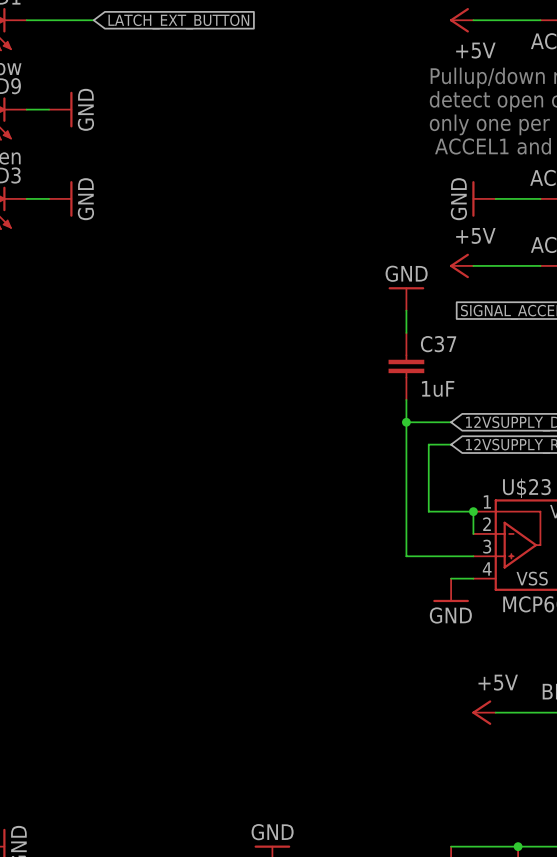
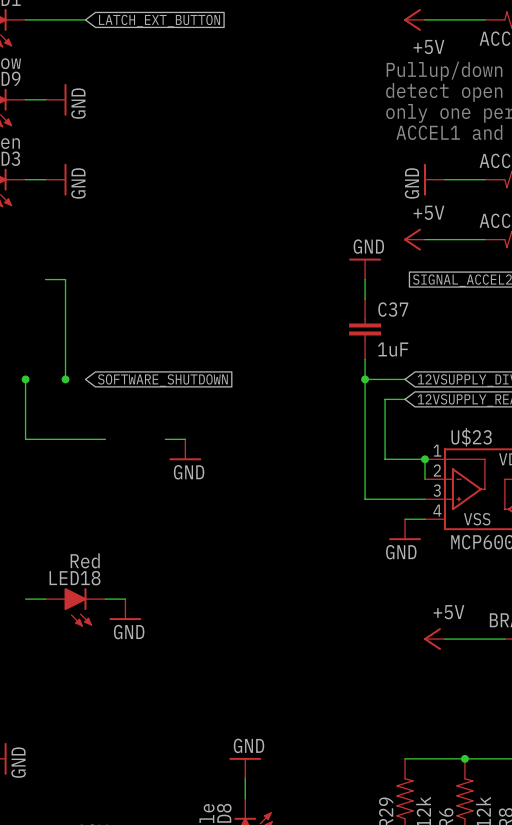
wire: none -> (45, 279) (65, 279) (65, 379)
wire: none -> (25, 379) (25, 439) (105, 439)
junction: none -> (25, 379)
junction: none -> (65, 379)
global label: none -> SOFTWARE_SHUTDOWN (162, 380)
wire: none -> (165, 439) (185, 439)
power symbol: none -> GND (185, 449)
wire: none -> (25, 599) (45, 599)
wire: none -> (105, 599) (125, 599)
LED18: none -> Red (75, 607)
power symbol: none -> GND (125, 609)

